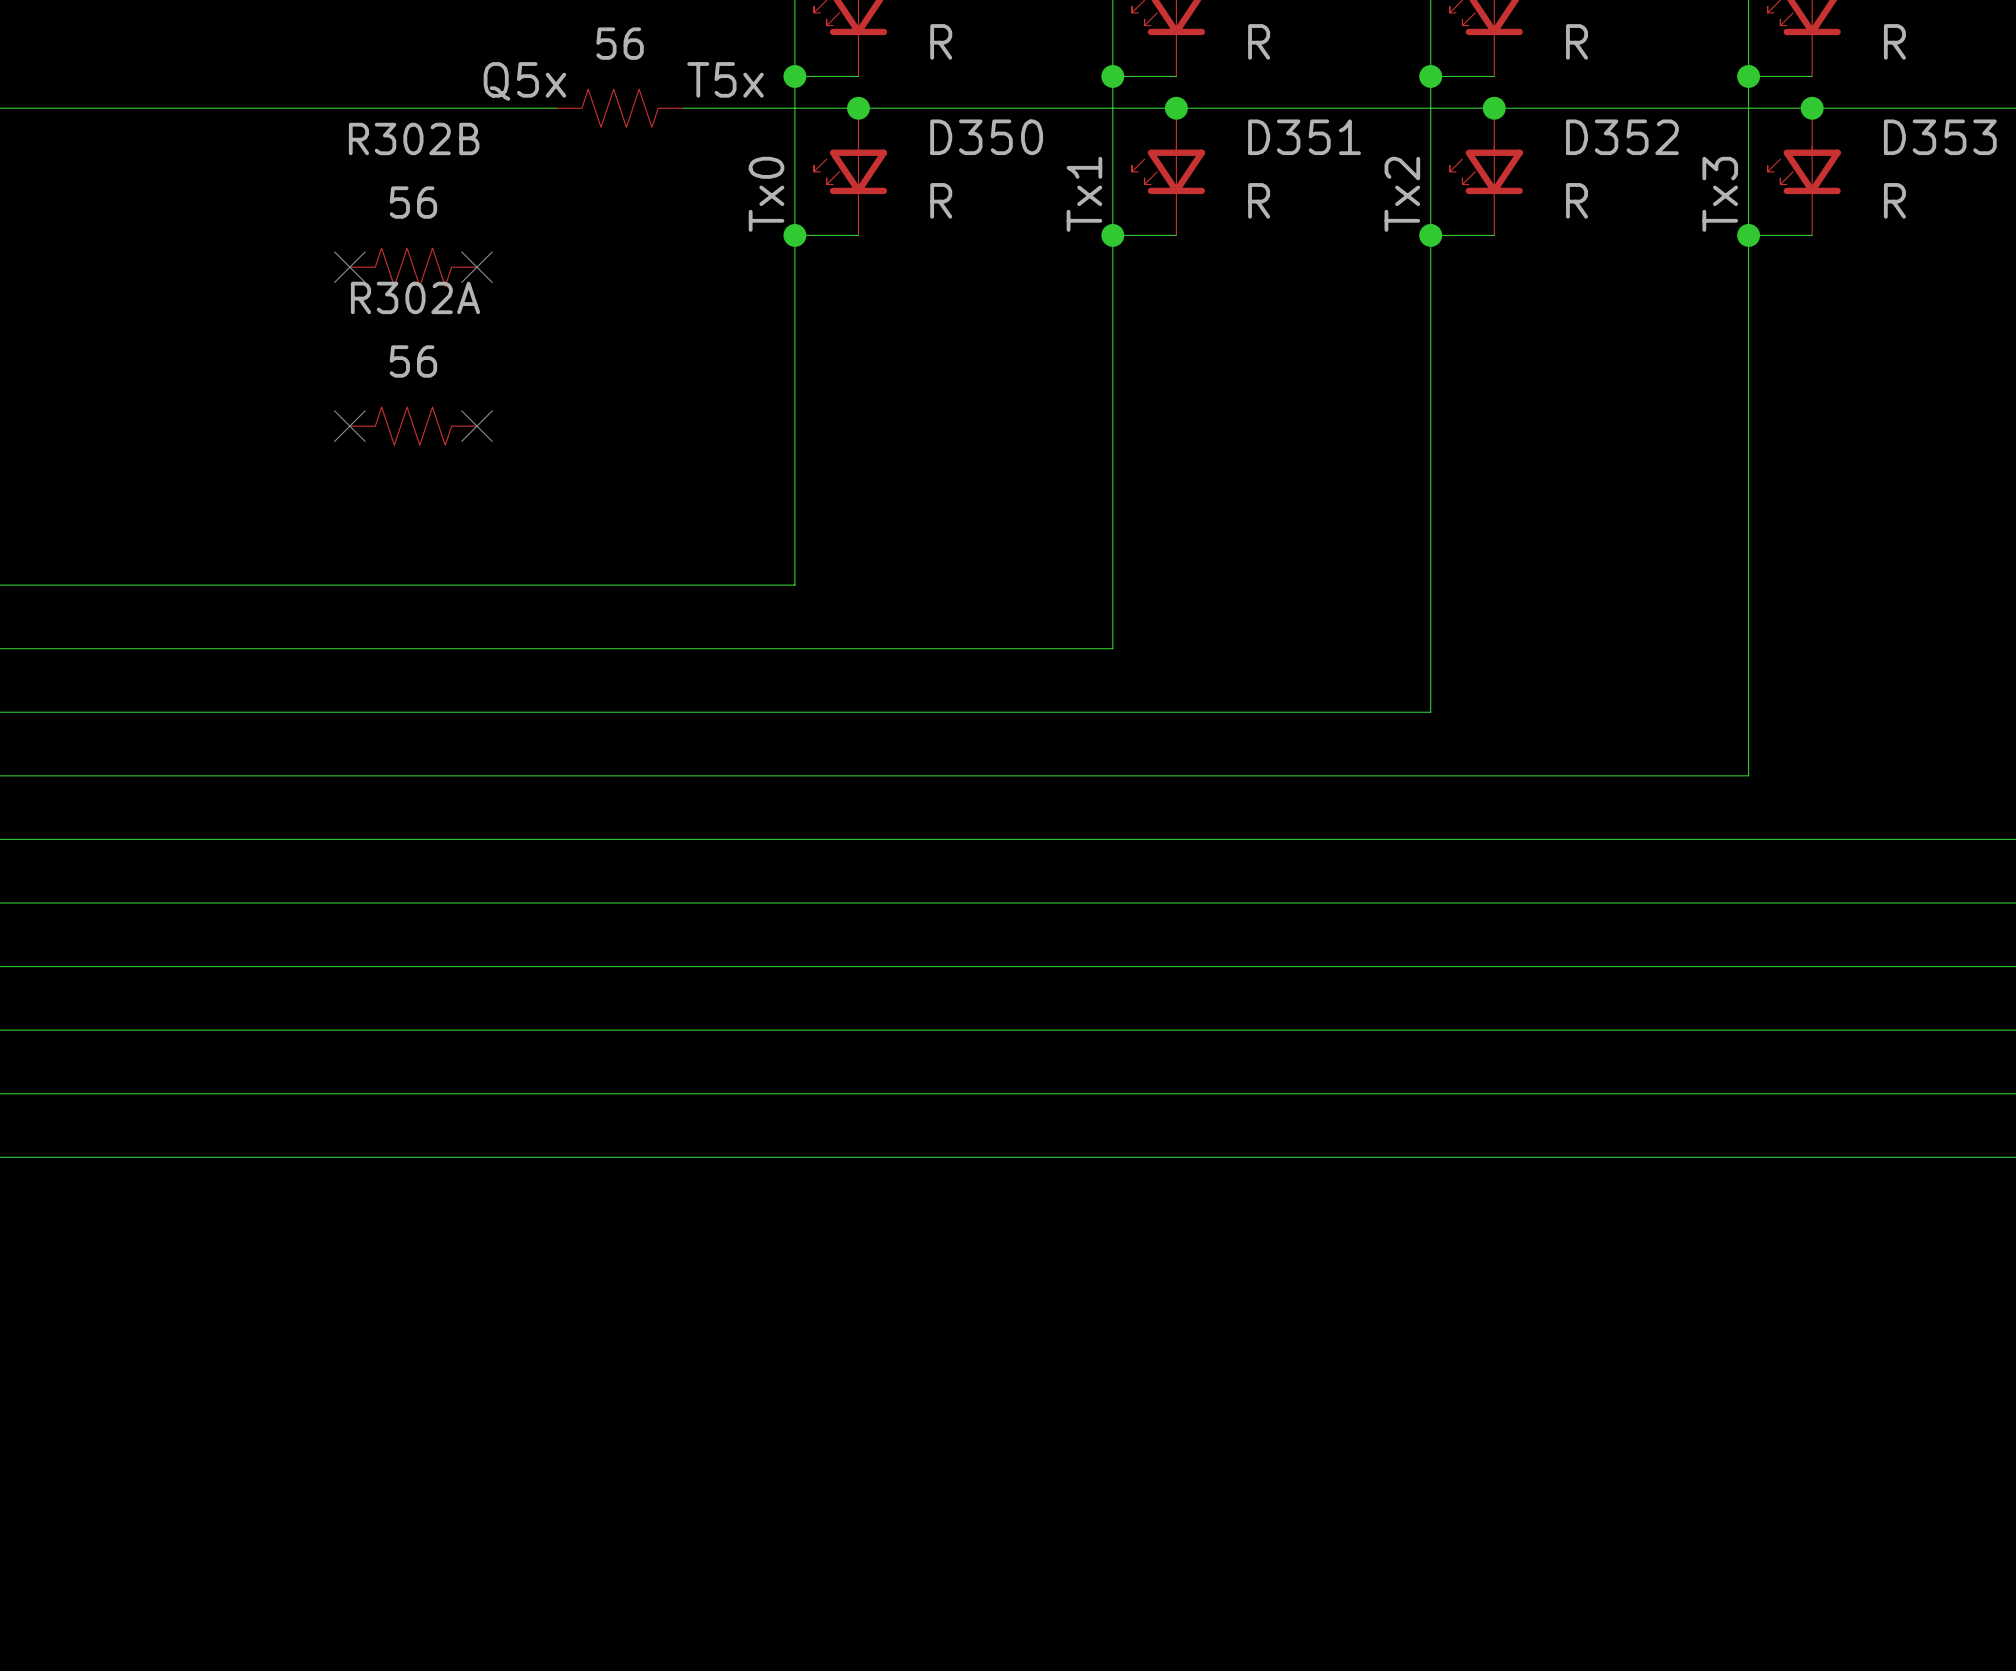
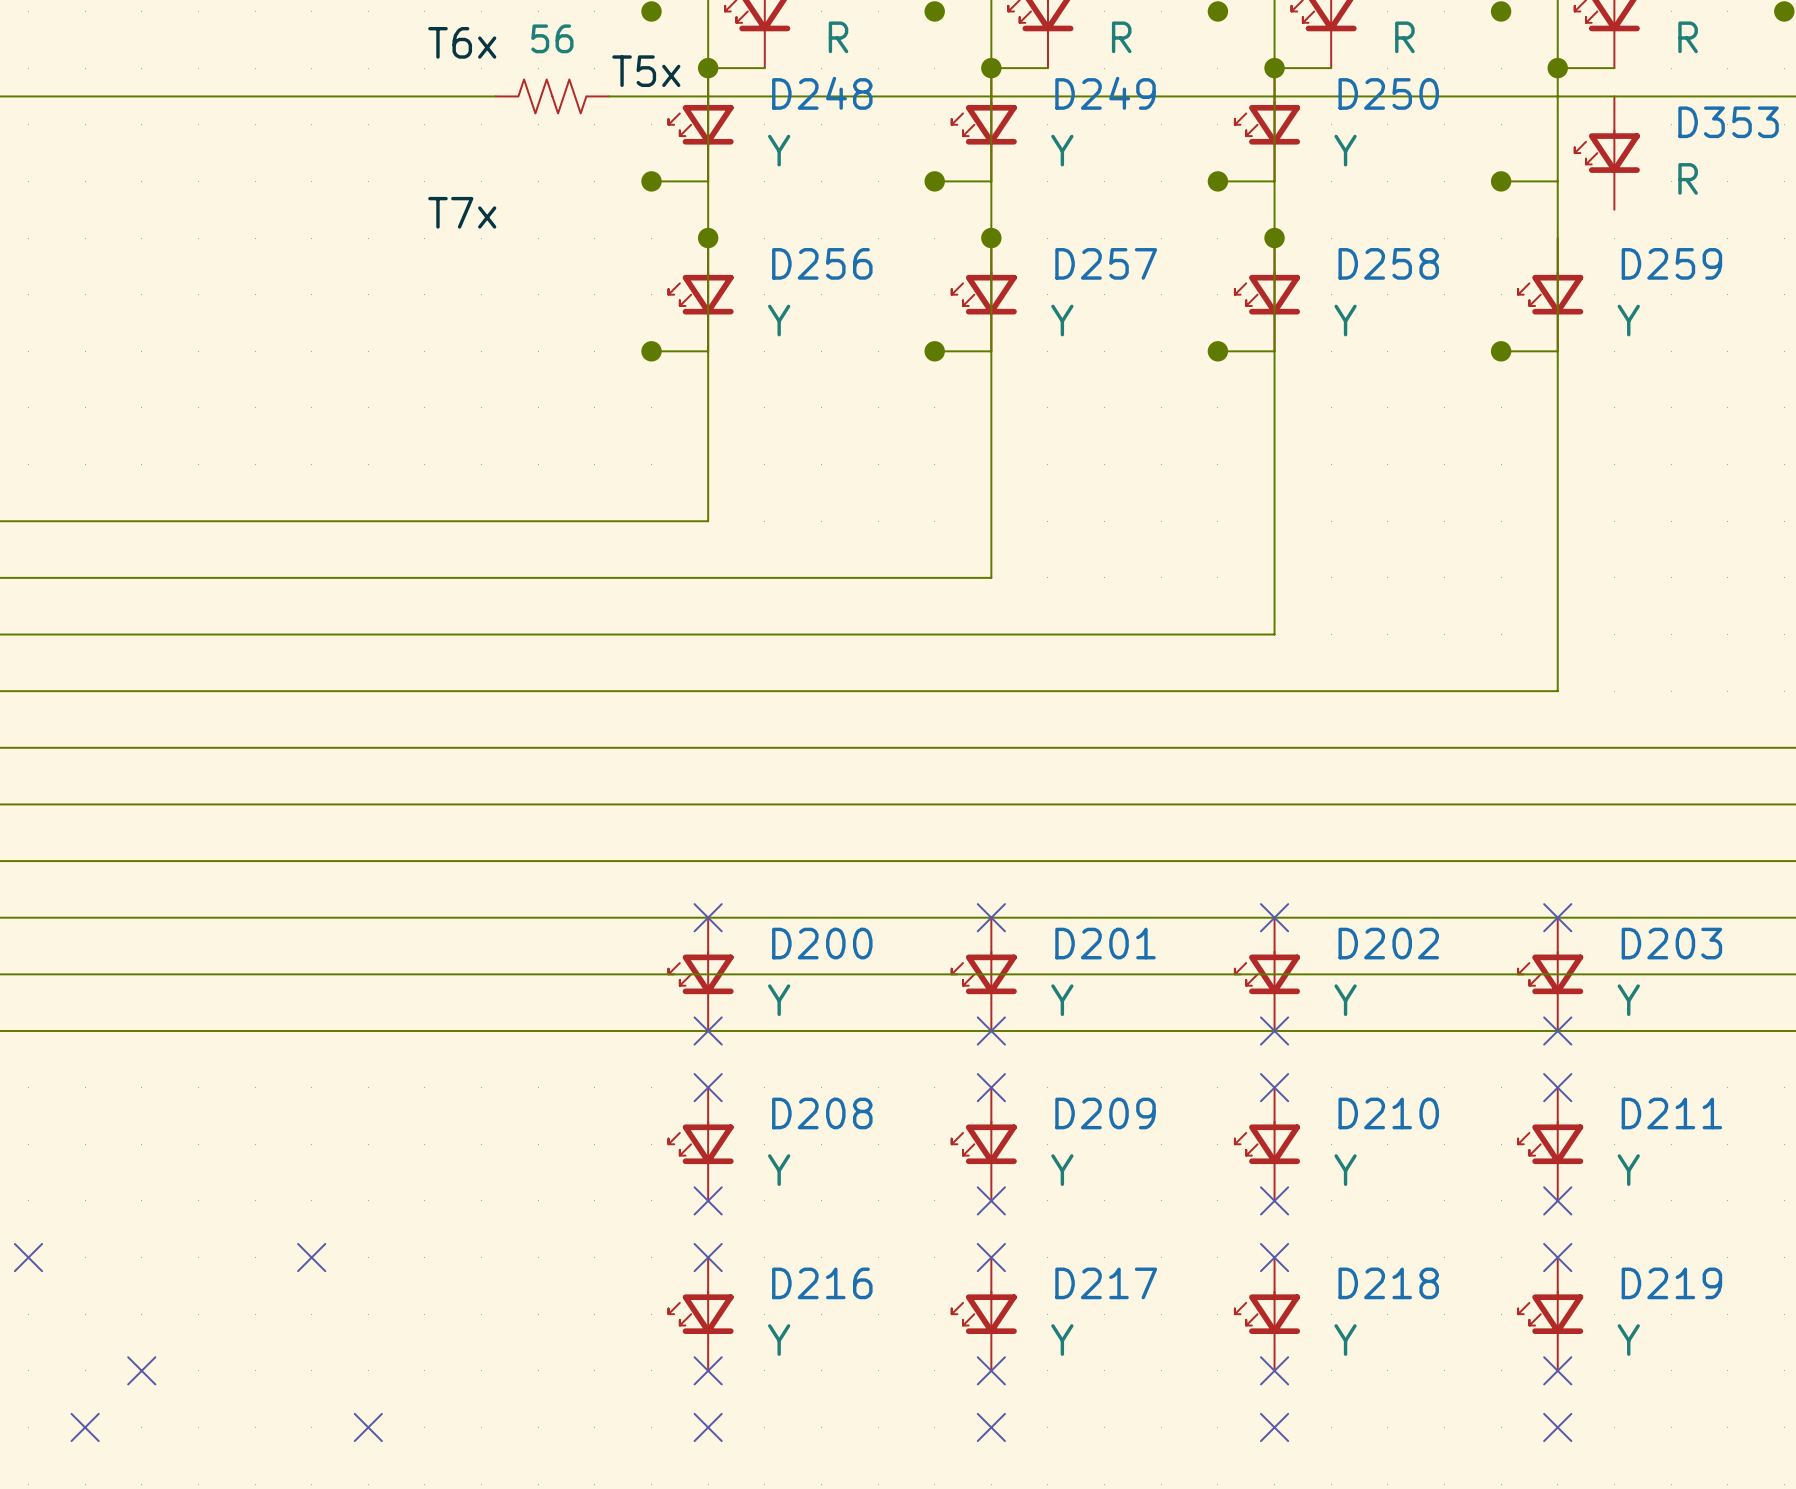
junction: none -> (651, 11)
junction: none -> (934, 11)
junction: none -> (1217, 11)
junction: none -> (1501, 11)
junction: none -> (1784, 11)
label: none -> T6x (462, 42)
label: Q5x (524, 81) -> none
junction: (858, 108) -> none
junction: (1176, 108) -> none
junction: (1494, 108) -> none
junction: (1812, 108) -> none
D248: none -> Y (701, 124)
D249: none -> Y (984, 124)
D250: none -> Y (1267, 124)
D350: R (850, 171) -> none
D351: R (1168, 171) -> none
D352: R (1486, 171) -> none
label: Tx0 (766, 194) -> none
label: Tx1 (1084, 194) -> none
label: Tx2 (1402, 194) -> none
label: Tx3 (1720, 194) -> none
junction: none -> (651, 181)
junction: none -> (934, 181)
junction: none -> (1217, 181)
wire: (794, 235) (858, 235) -> (651, 181) (708, 181)
junction position: (794, 235) -> (708, 238)
wire: (1112, 235) (1176, 235) -> (934, 181) (991, 181)
junction position: (1112, 235) -> (991, 238)
wire: (1430, 235) (1494, 235) -> (1217, 181) (1274, 181)
junction position: (1430, 235) -> (1274, 238)
wire: (1748, 235) (1812, 235) -> (1501, 181) (1557, 181)
junction position: (1748, 235) -> (1501, 181)
label: none -> T7x (462, 212)
no-connect mark: (349, 267) -> none
R302B: 56 (413, 267) -> none
no-connect mark: (477, 267) -> none
D256: none -> Y (701, 294)
D257: none -> Y (984, 294)
D258: none -> Y (1267, 294)
D259: none -> Y (1550, 294)
wire: none -> (651, 351) (708, 351)
junction: none -> (651, 351)
wire: none -> (934, 351) (991, 351)
junction: none -> (934, 351)
wire: none -> (1217, 351) (1274, 351)
junction: none -> (1217, 351)
wire: none -> (1501, 351) (1557, 351)
junction: none -> (1501, 351)
no-connect mark: (349, 426) -> none
R302A: 56 (413, 426) -> none
no-connect mark: (477, 426) -> none
no-connect mark: none -> (708, 917)
no-connect mark: none -> (991, 917)
no-connect mark: none -> (1274, 917)
no-connect mark: none -> (1557, 917)
D200: none -> Y (701, 974)
D201: none -> Y (984, 974)
D202: none -> Y (1267, 974)
D203: none -> Y (1550, 974)
no-connect mark: none -> (708, 1030)
no-connect mark: none -> (991, 1030)
no-connect mark: none -> (1274, 1030)
no-connect mark: none -> (1557, 1030)
no-connect mark: none -> (708, 1087)
no-connect mark: none -> (991, 1087)
no-connect mark: none -> (1274, 1087)
no-connect mark: none -> (1557, 1087)
D208: none -> Y (701, 1144)
D209: none -> Y (984, 1144)
D210: none -> Y (1267, 1144)
D211: none -> Y (1550, 1144)
no-connect mark: none -> (708, 1200)
no-connect mark: none -> (991, 1200)
no-connect mark: none -> (1274, 1200)
no-connect mark: none -> (1557, 1200)
no-connect mark: none -> (28, 1257)
no-connect mark: none -> (311, 1257)
no-connect mark: none -> (708, 1257)
no-connect mark: none -> (991, 1257)
no-connect mark: none -> (1274, 1257)
no-connect mark: none -> (1557, 1257)
D216: none -> Y (701, 1314)
D217: none -> Y (984, 1314)
D218: none -> Y (1267, 1314)
D219: none -> Y (1550, 1314)
no-connect mark: none -> (141, 1370)
no-connect mark: none -> (708, 1370)
no-connect mark: none -> (991, 1370)
no-connect mark: none -> (1274, 1370)
no-connect mark: none -> (1557, 1370)
no-connect mark: none -> (85, 1427)
no-connect mark: none -> (368, 1427)
no-connect mark: none -> (708, 1427)
no-connect mark: none -> (991, 1427)
no-connect mark: none -> (1274, 1427)
no-connect mark: none -> (1557, 1427)

